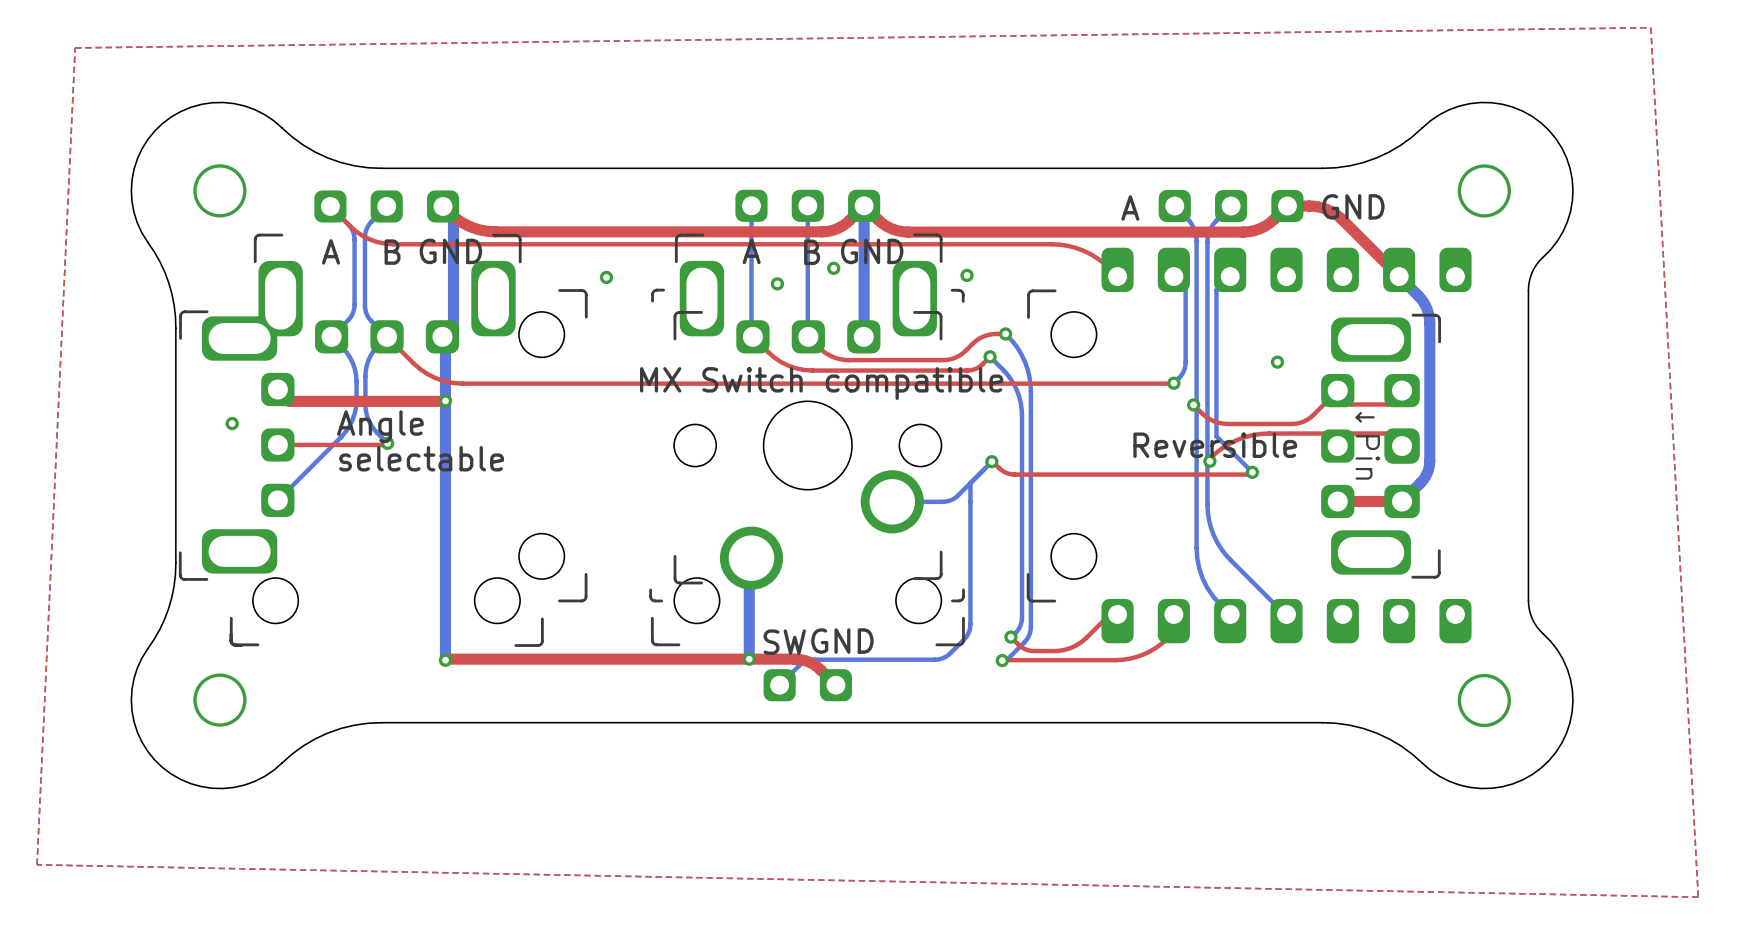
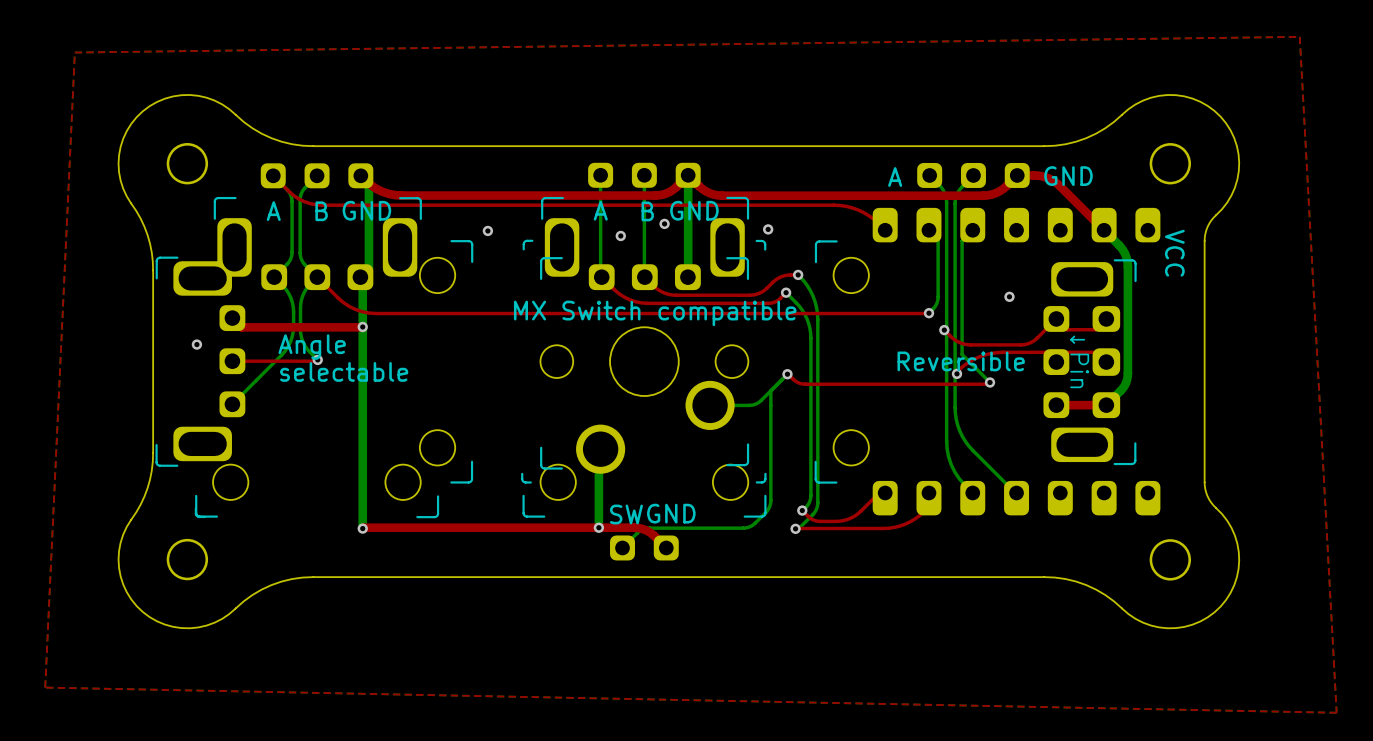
text: none -> VCC (1174, 253)

